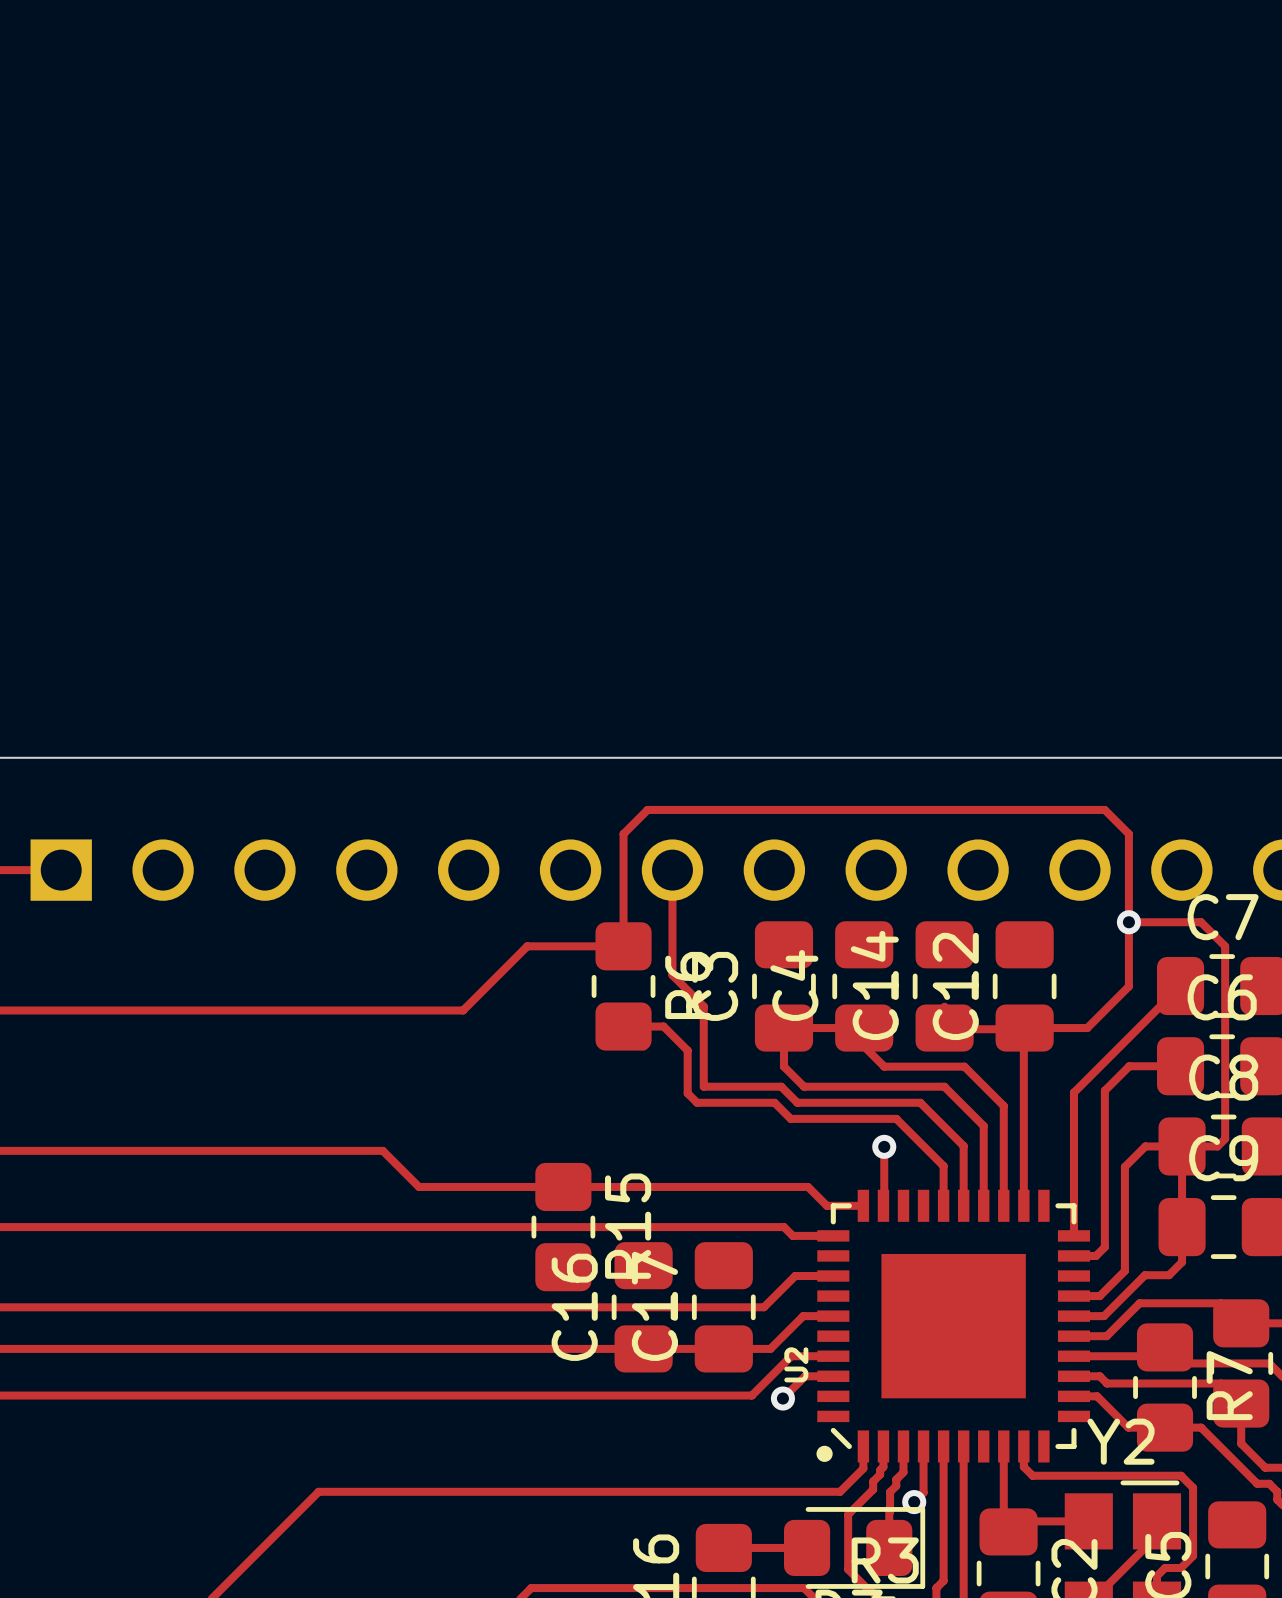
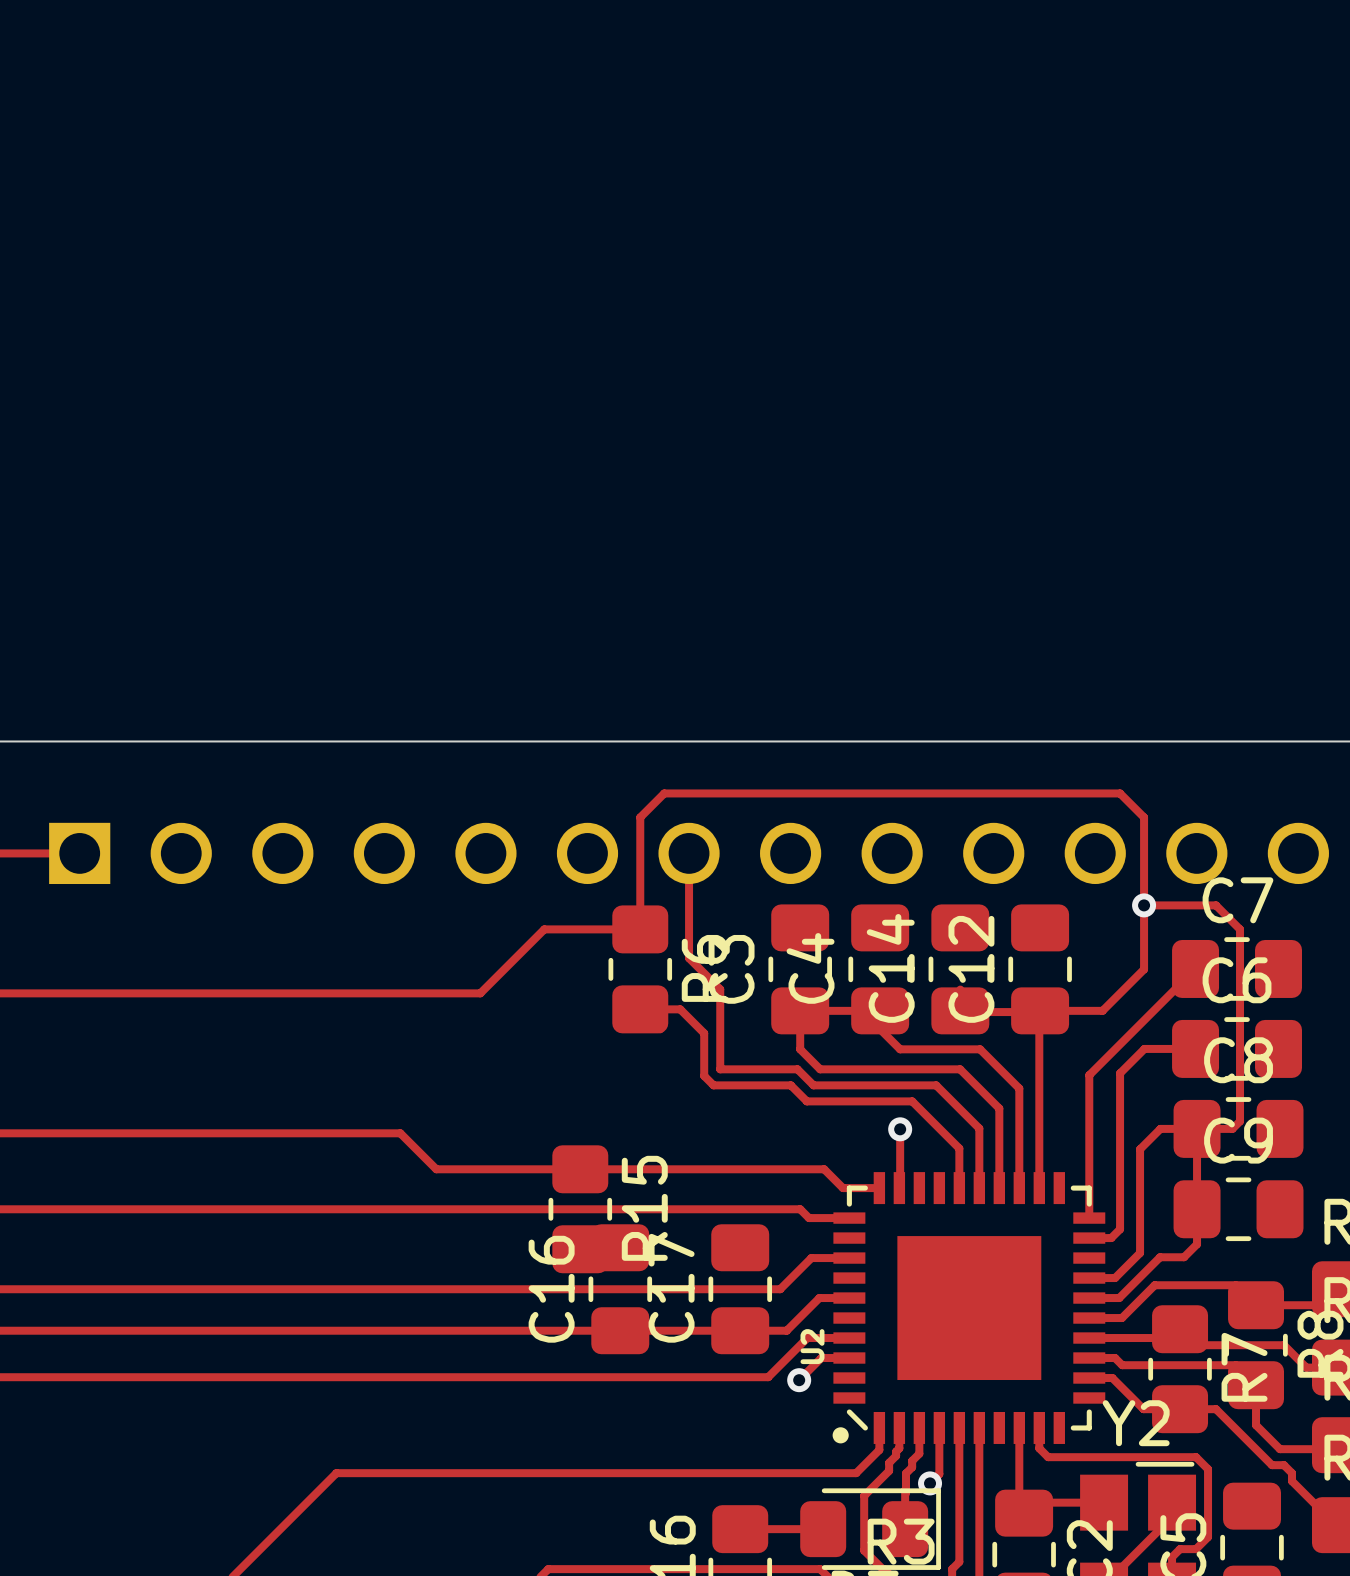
C16 position: (643, 1307) -> (620, 1289)

